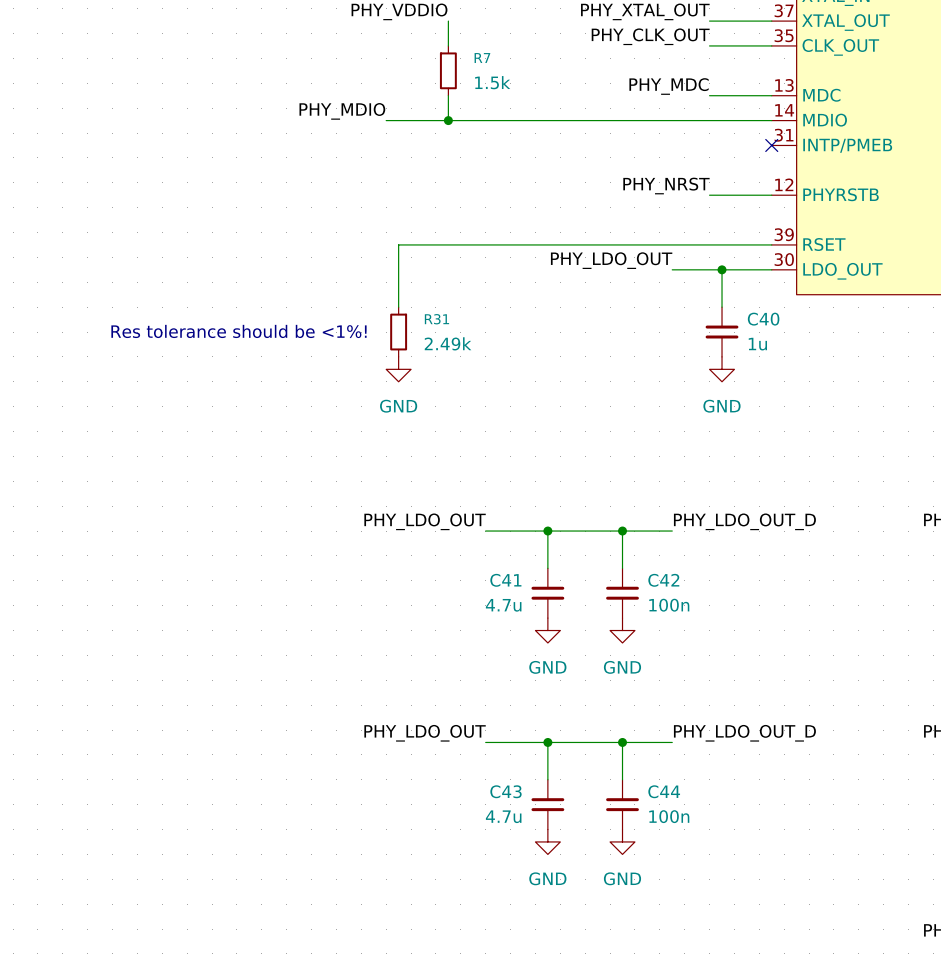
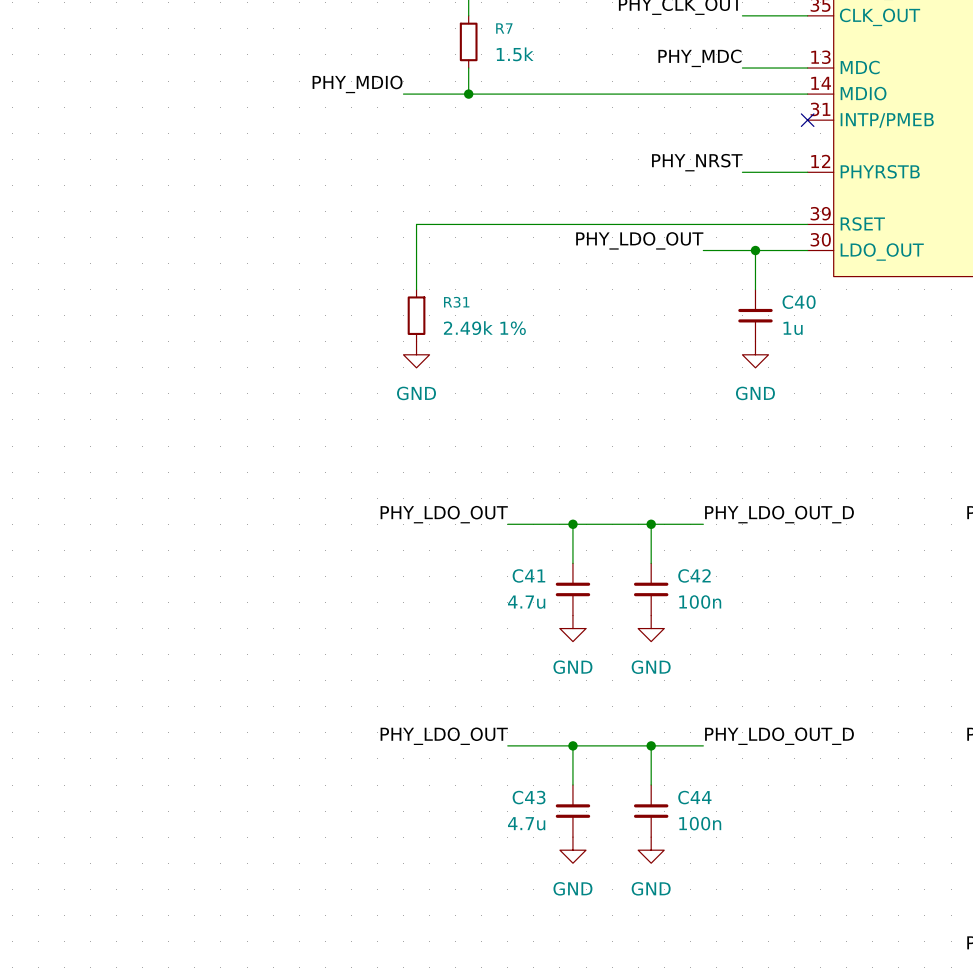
text: Res tolerance should be <1%! (238, 331) -> none
R31 value: 2.49k (448, 343) -> 2.49k 1% (484, 328)

